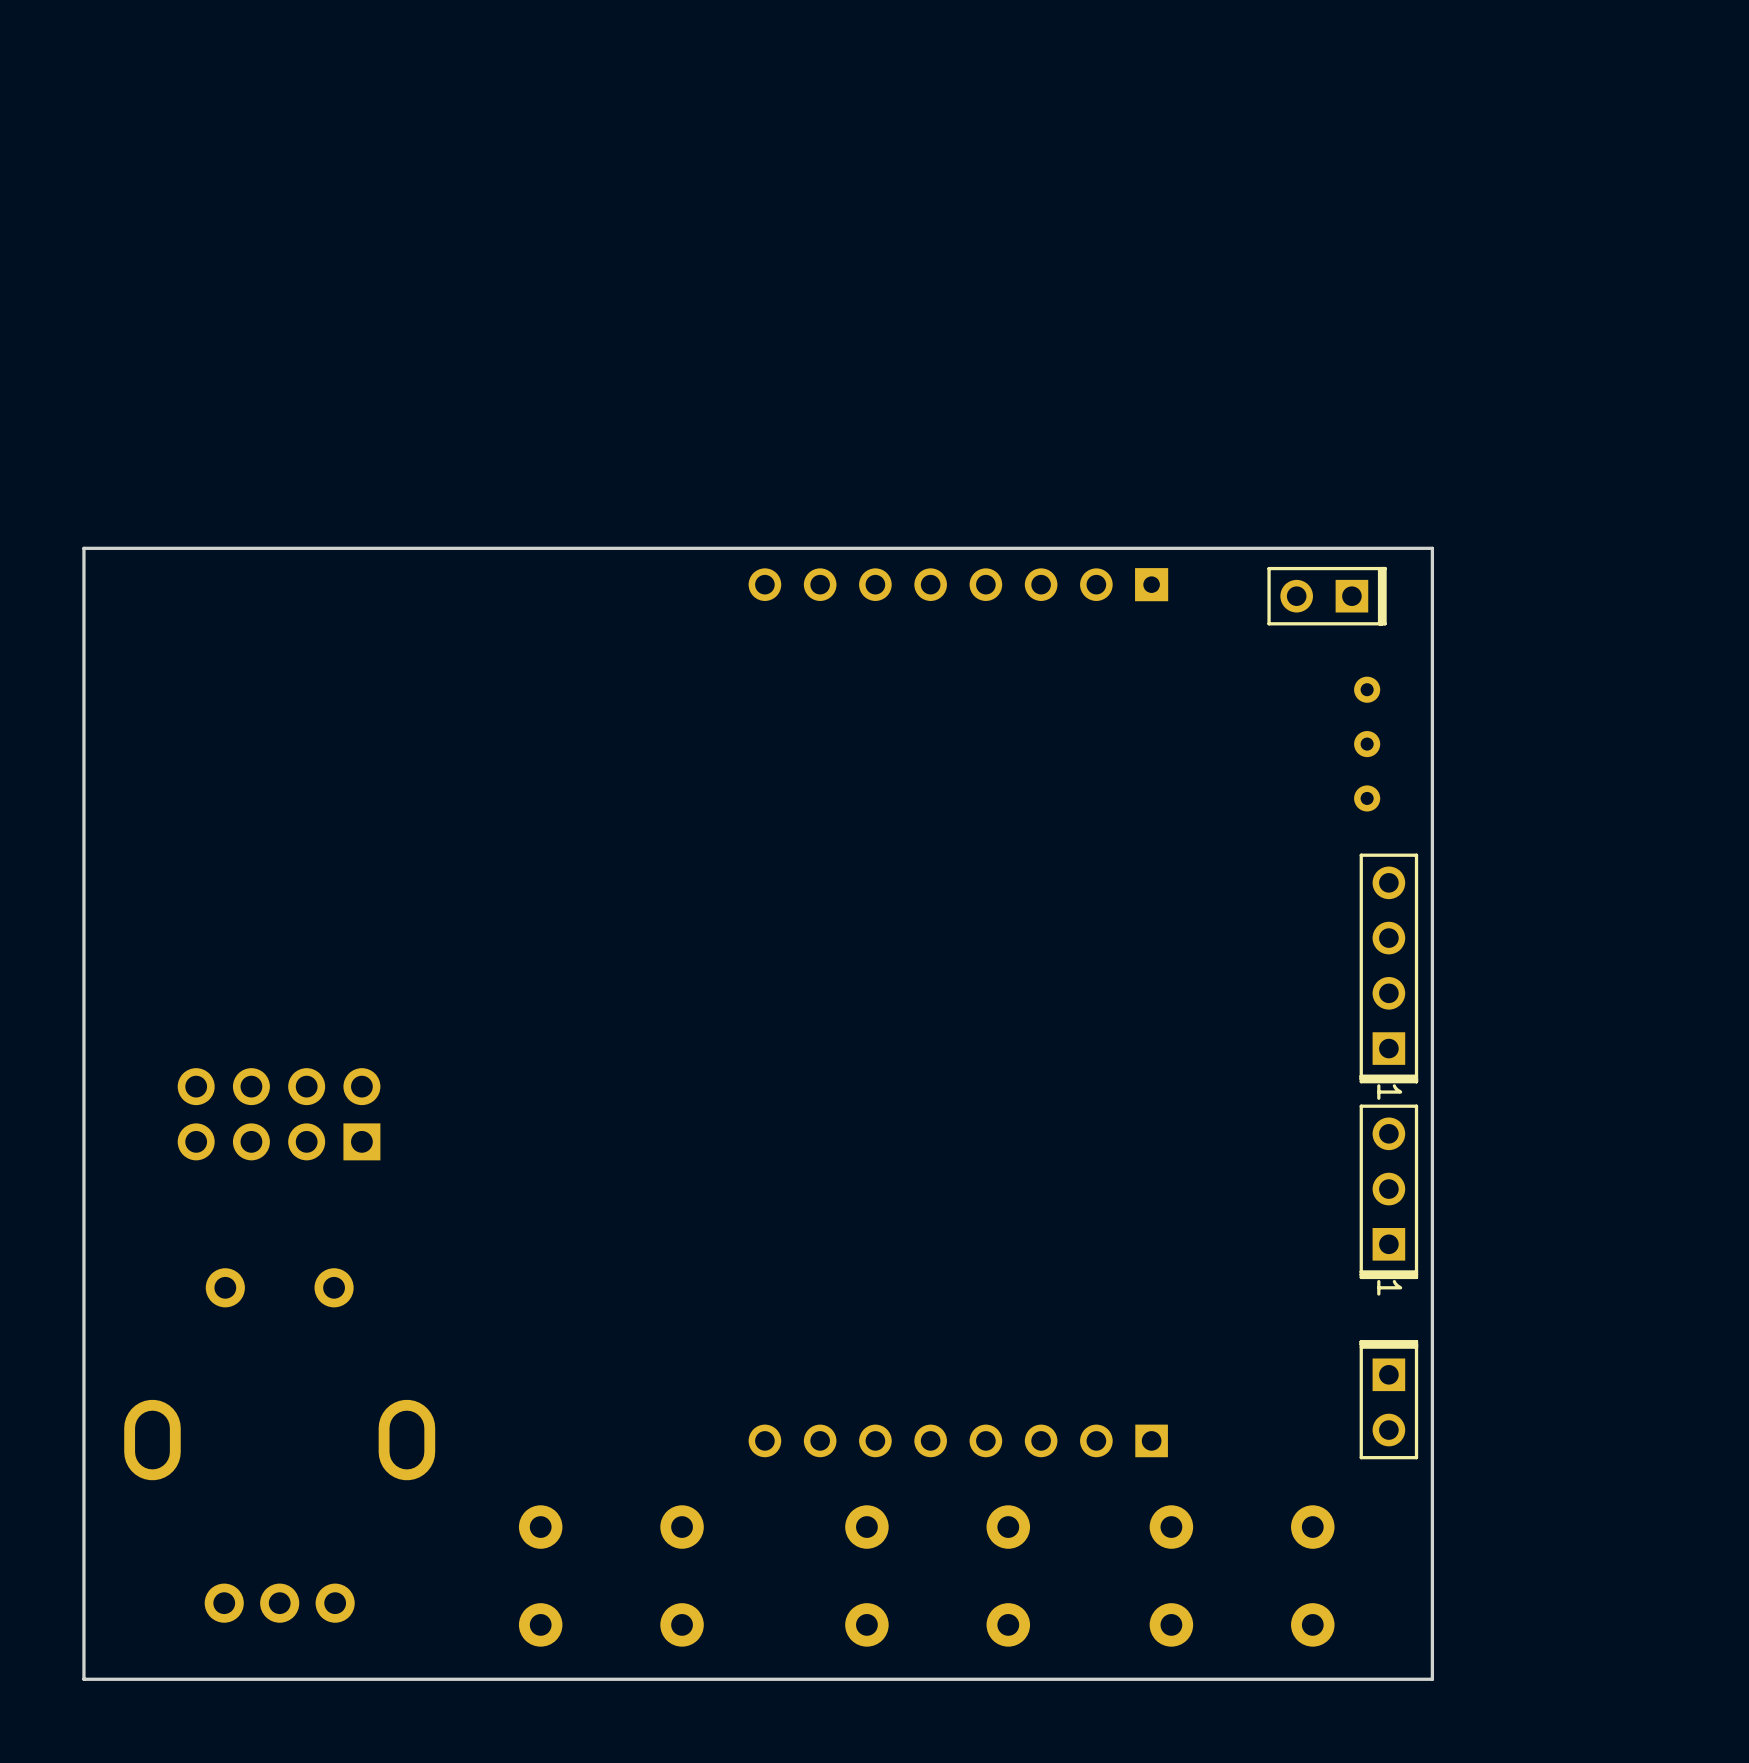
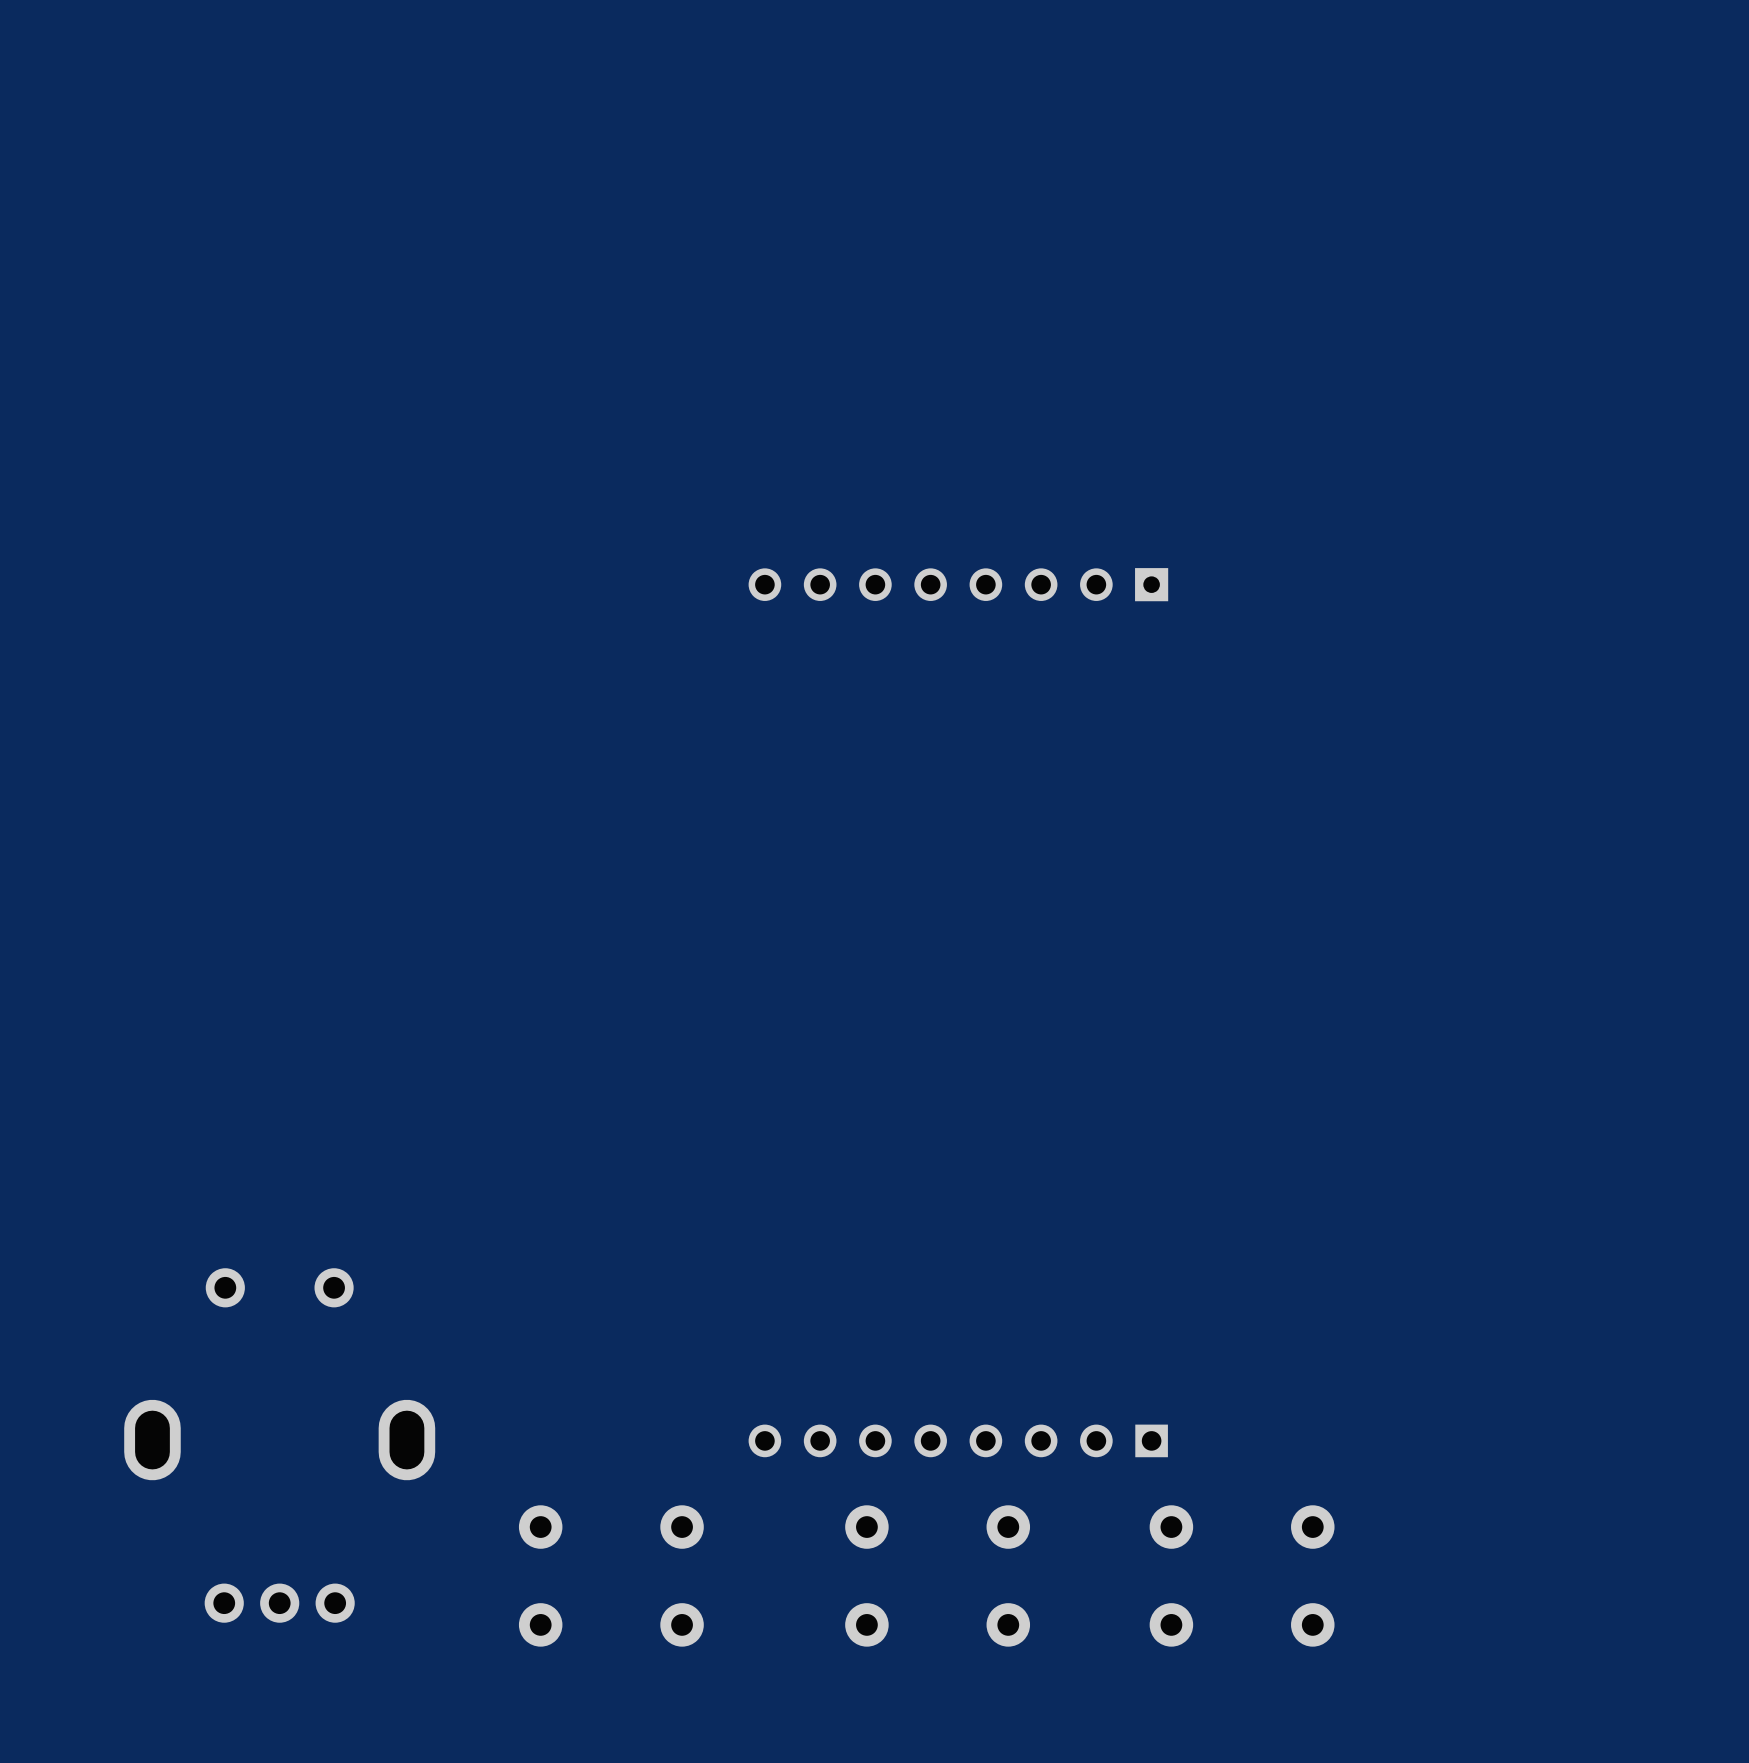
board edge: (1432, 548) (1432, 1679) (83, 1679) (83, 548) (1432, 548) -> none
part: (1327, 596) -> none
part: (1367, 744) -> none
part: (1388, 968) -> none
part: (279, 1114) -> none
part: (1388, 1191) -> none
part: (1388, 1399) -> none

